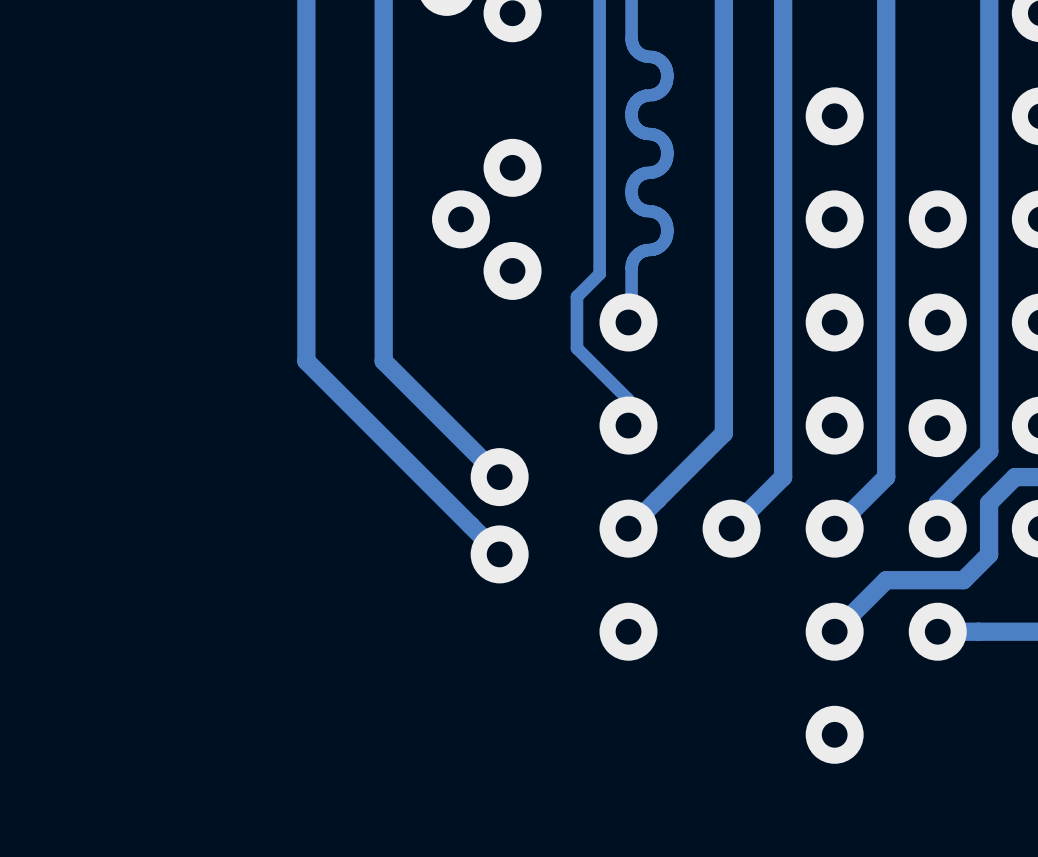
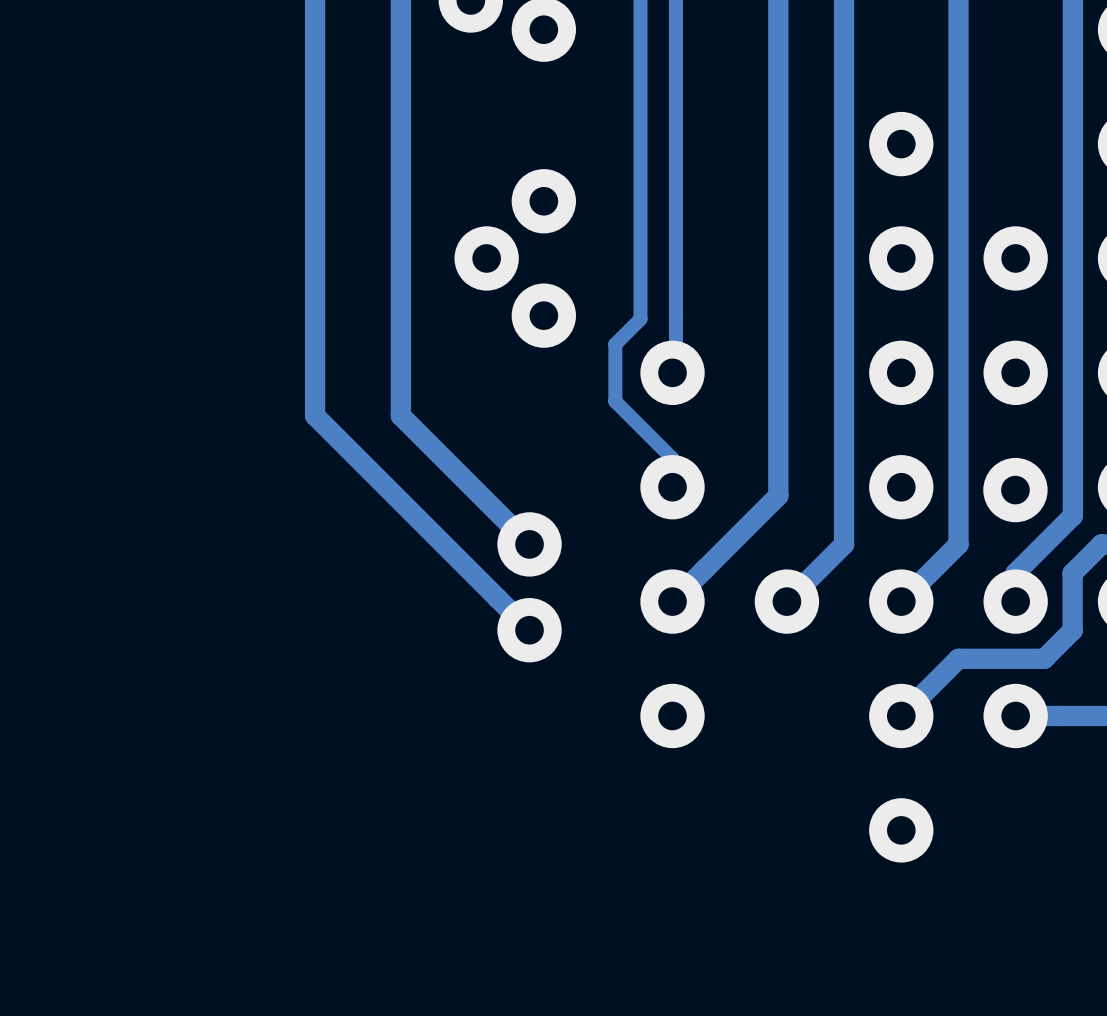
track: (631, 38) (633, 46) (638, 52) (660, 60) (665, 66) (667, 74) (663, 88) (657, 93) (638, 99) (633, 105) (631, 113) -> (675, 58) (675, 140)
track: (631, 116) (633, 123) (638, 130) (660, 137) (665, 144) (667, 151) (663, 165) (657, 170) (638, 176) (633, 182) (631, 190) -> (675, 143) (675, 226)
track: (631, 193) (633, 201) (638, 207) (660, 215) (665, 221) (667, 229) (663, 243) (657, 248) (638, 253) (633, 260) (631, 267) -> (675, 229) (675, 312)

